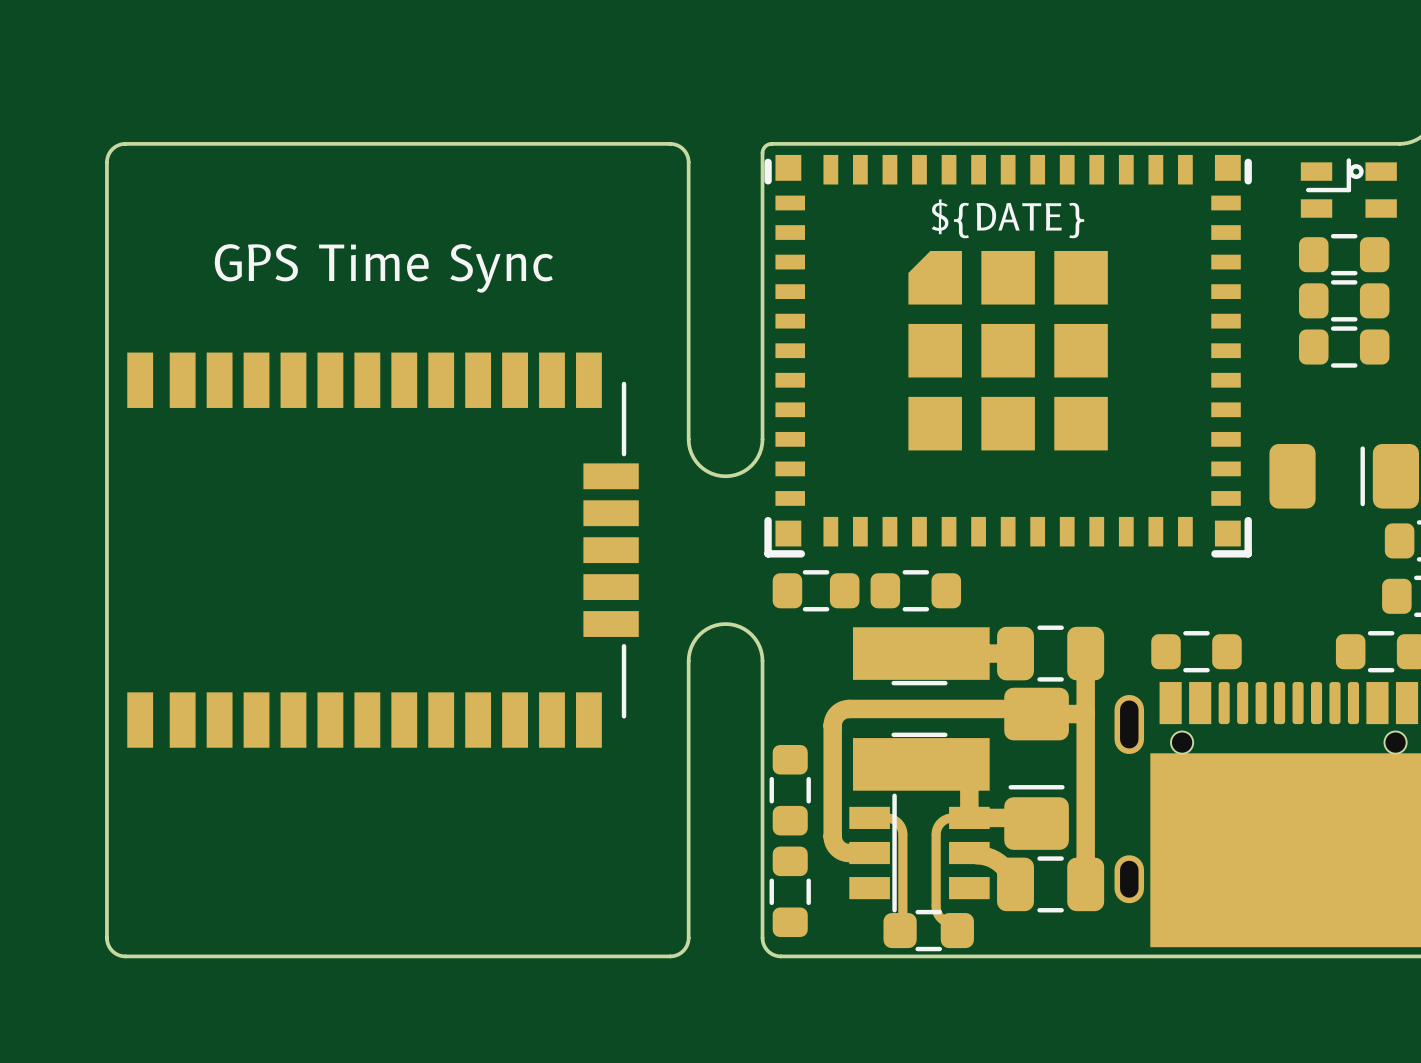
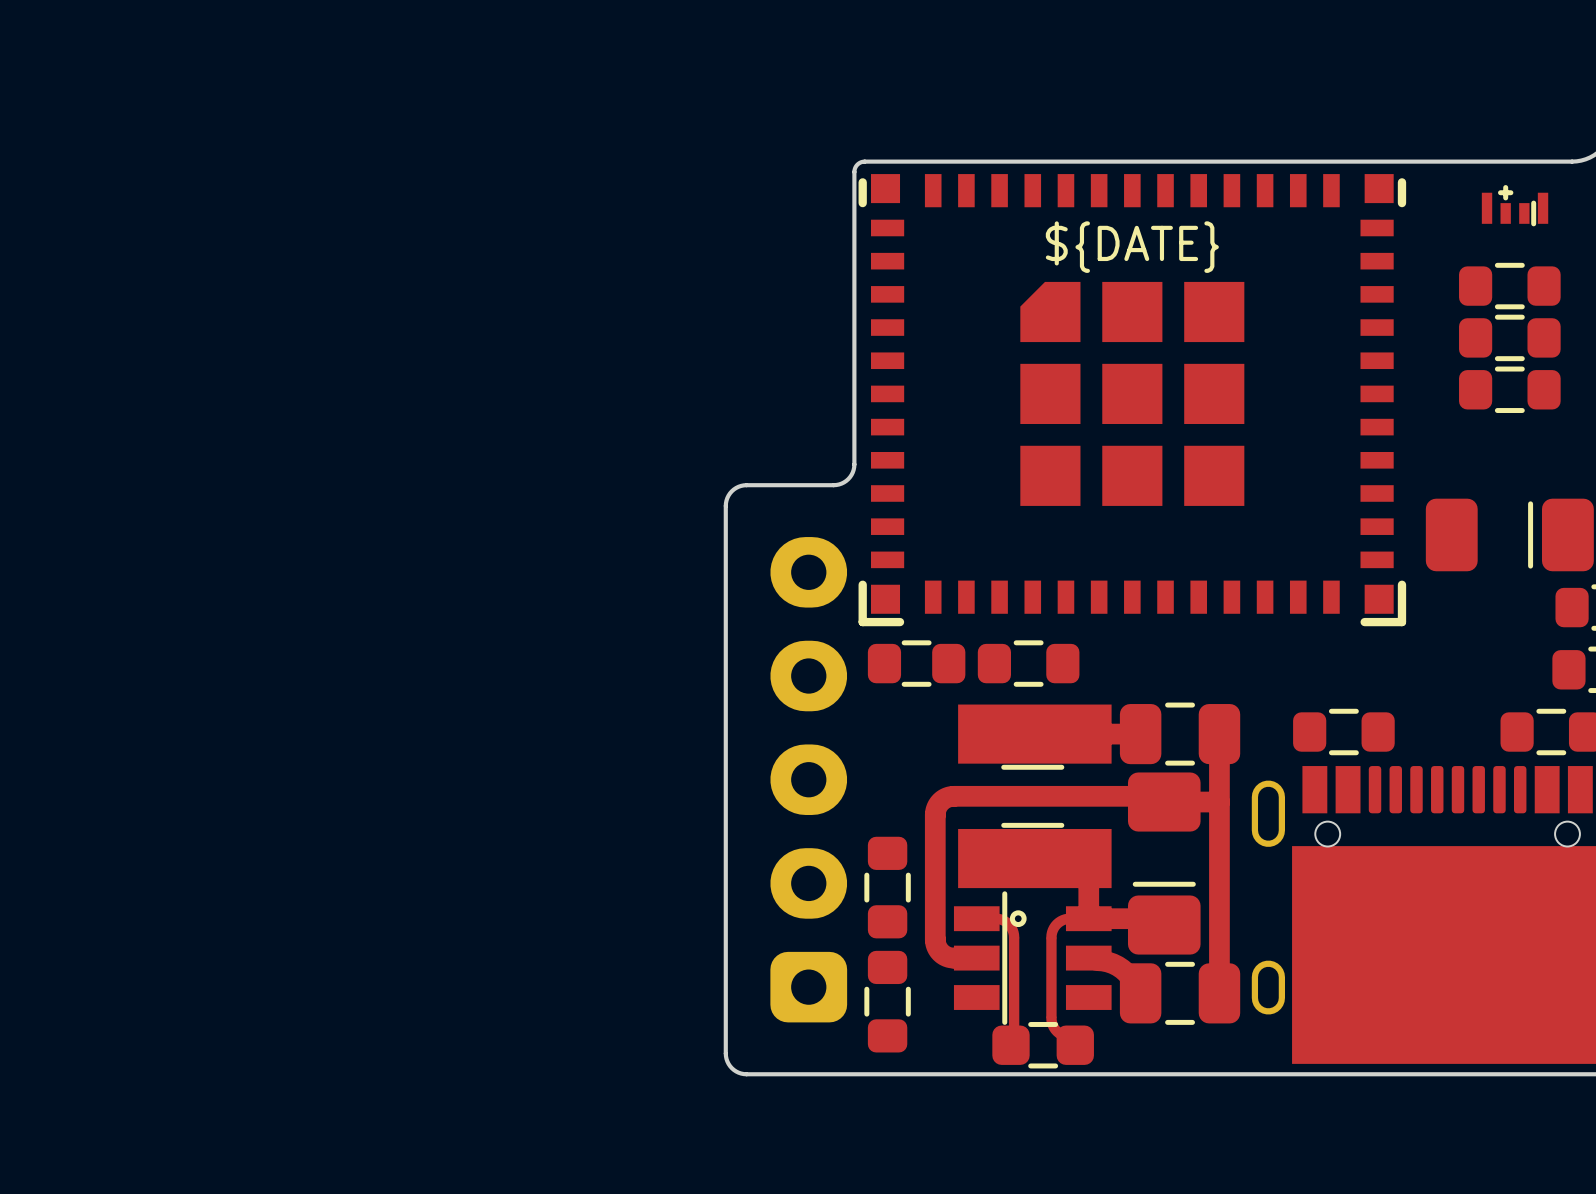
board edge: (771, 143) (765, 146) (762, 153) (762, 444) (759, 453) (751, 465) (739, 473) (725, 476) (711, 473) (699, 465) (691, 453) (688, 444) (688, 162) (686, 153) (679, 146) (670, 143) (125, 143) (114, 147) (107, 159) (106, 937) (110, 949) (116, 953) (125, 956) (664, 956) -> (866, 161) (858, 163) (854, 171) (854, 464) (852, 472) (846, 480) (836, 485) (741, 485) (730, 493) (725, 503) (725, 1053) (727, 1061) (731, 1068) (738, 1072) (746, 1074)
part footprint: [1300, 158, 1397, 218] -> [1481, 185, 1549, 227]
text: GPS Time Sync (383, 268) -> none
part: (383, 550) -> none
part footprint: [823, 626, 1105, 949] -> [924, 704, 1241, 1065]
part: none -> (808, 779)
board edge: (670, 956) (683, 951) (688, 937) (688, 656) (691, 646) (699, 634) (711, 626) (725, 624) (739, 626) (751, 634) (759, 646) (762, 656) (762, 937) (767, 951) (780, 956) -> (752, 1074) (877, 1074)

